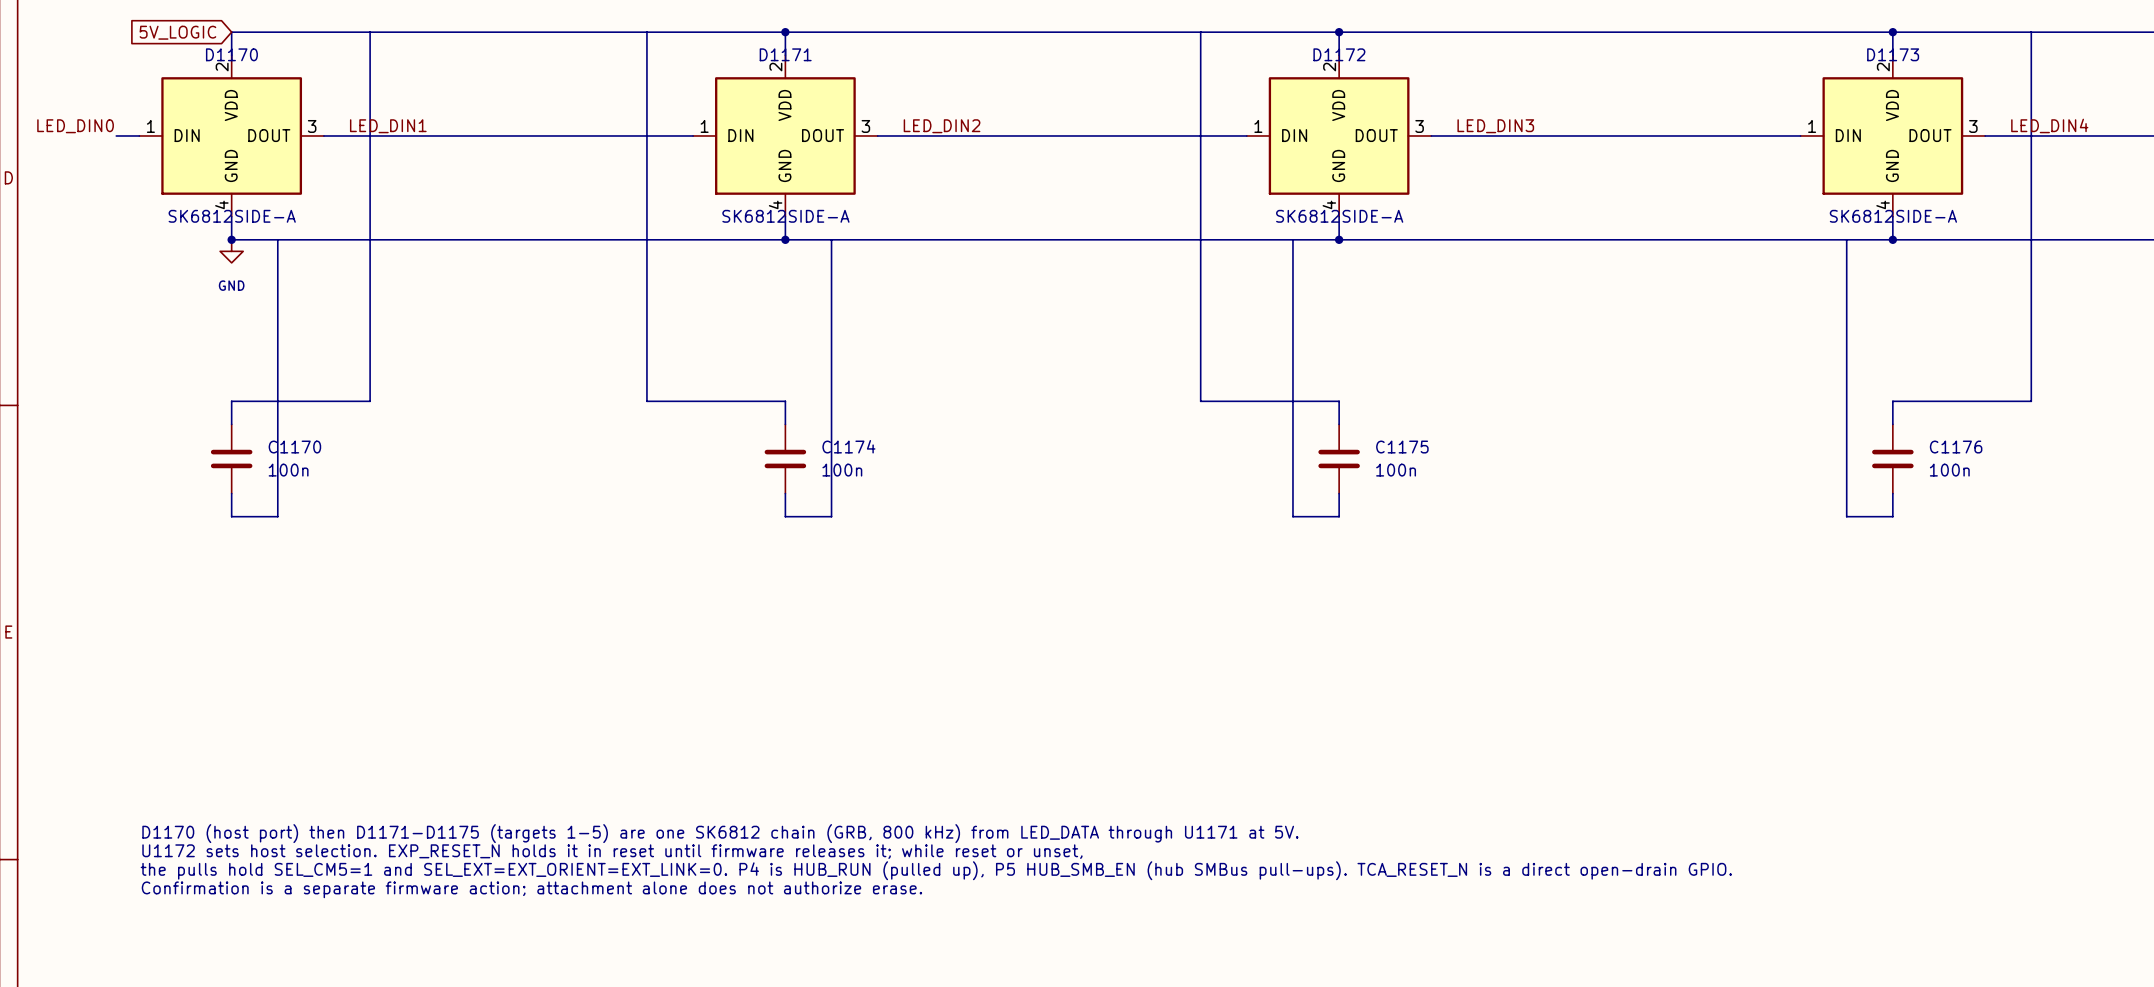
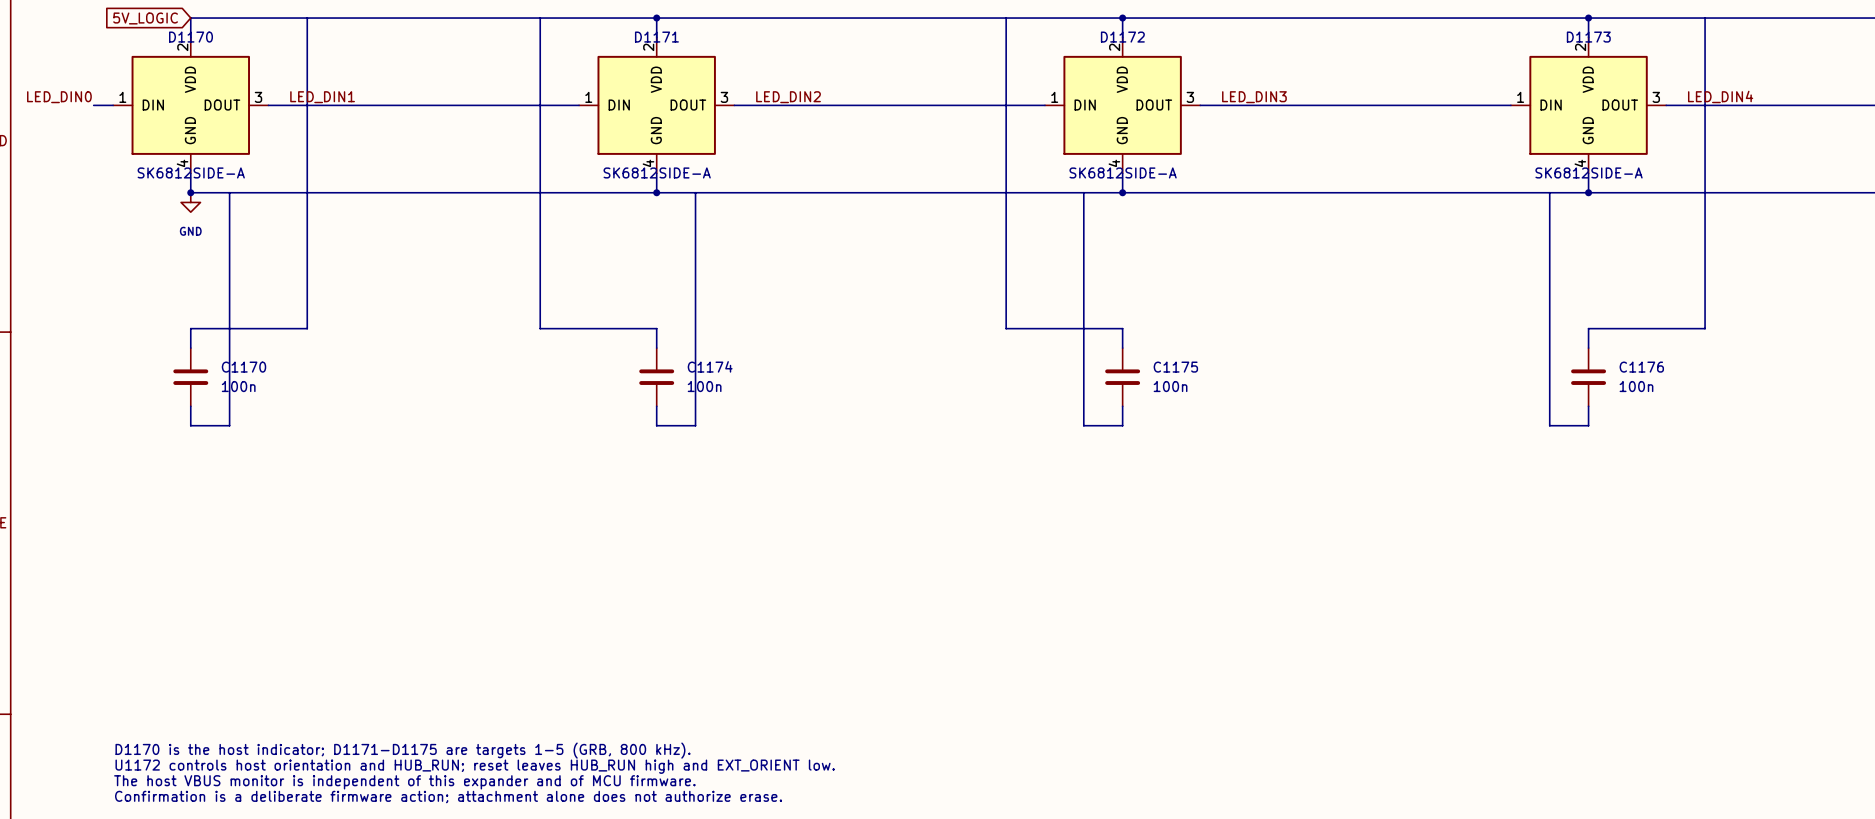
text: D1170 (host port) then D1171-D1175 (targets 1-5) are one SK6812 chain (GRB, 800 kHz) from LED_DATA through U1171 at 5V. (720, 833) -> none
text: U1172 sets host selection. EXP_RESET_N holds it in reset until firmware releases it; while reset or unset, (612, 851) -> none
text: the pulls hold SEL_CM5=1 and SEL_EXT=EXT_ORIENT=EXT_LINK=0. P4 is HUB_RUN (pulled up), P5 HUB_SMB_EN (hub SMBus pull-ups). TCA_RESET_N is a direct open-drain GPIO. (936, 870) -> none
text: Confirmation is a separate firmware action; attachment alone does not authorize erase. (531, 889) -> D1170 is the host indicator; D1171-D1175 are targets 1-5 (GRB, 800 kHz). (403, 750)
text: none -> U1172 controls host orientation and HUB_RUN; reset leaves HUB_RUN high and EXT_ORIENT low. (475, 766)
text: none -> The host VBUS monitor is independent of this expander and of MCU firmware. (404, 782)
text: none -> Confirmation is a deliberate firmware action; attachment alone does not authorize erase. (448, 797)

